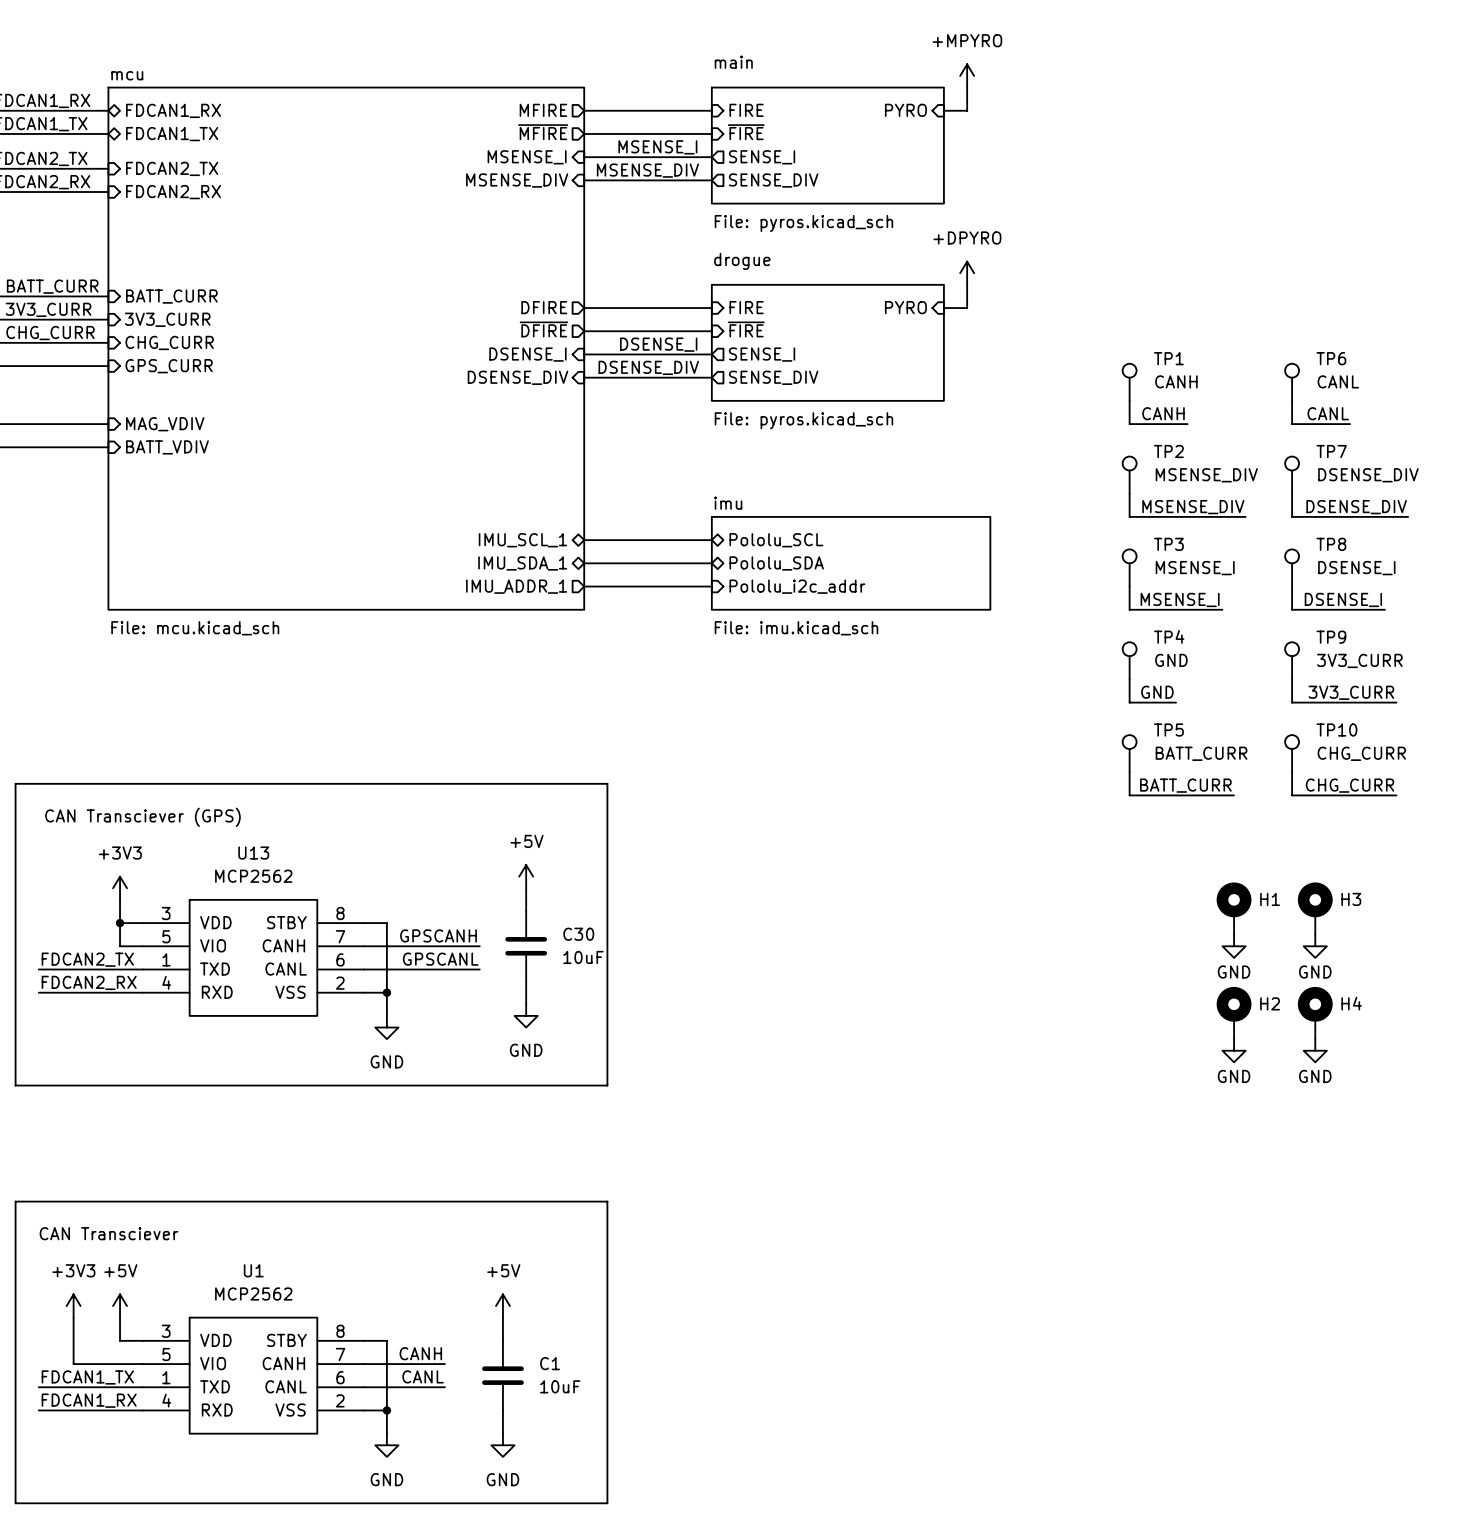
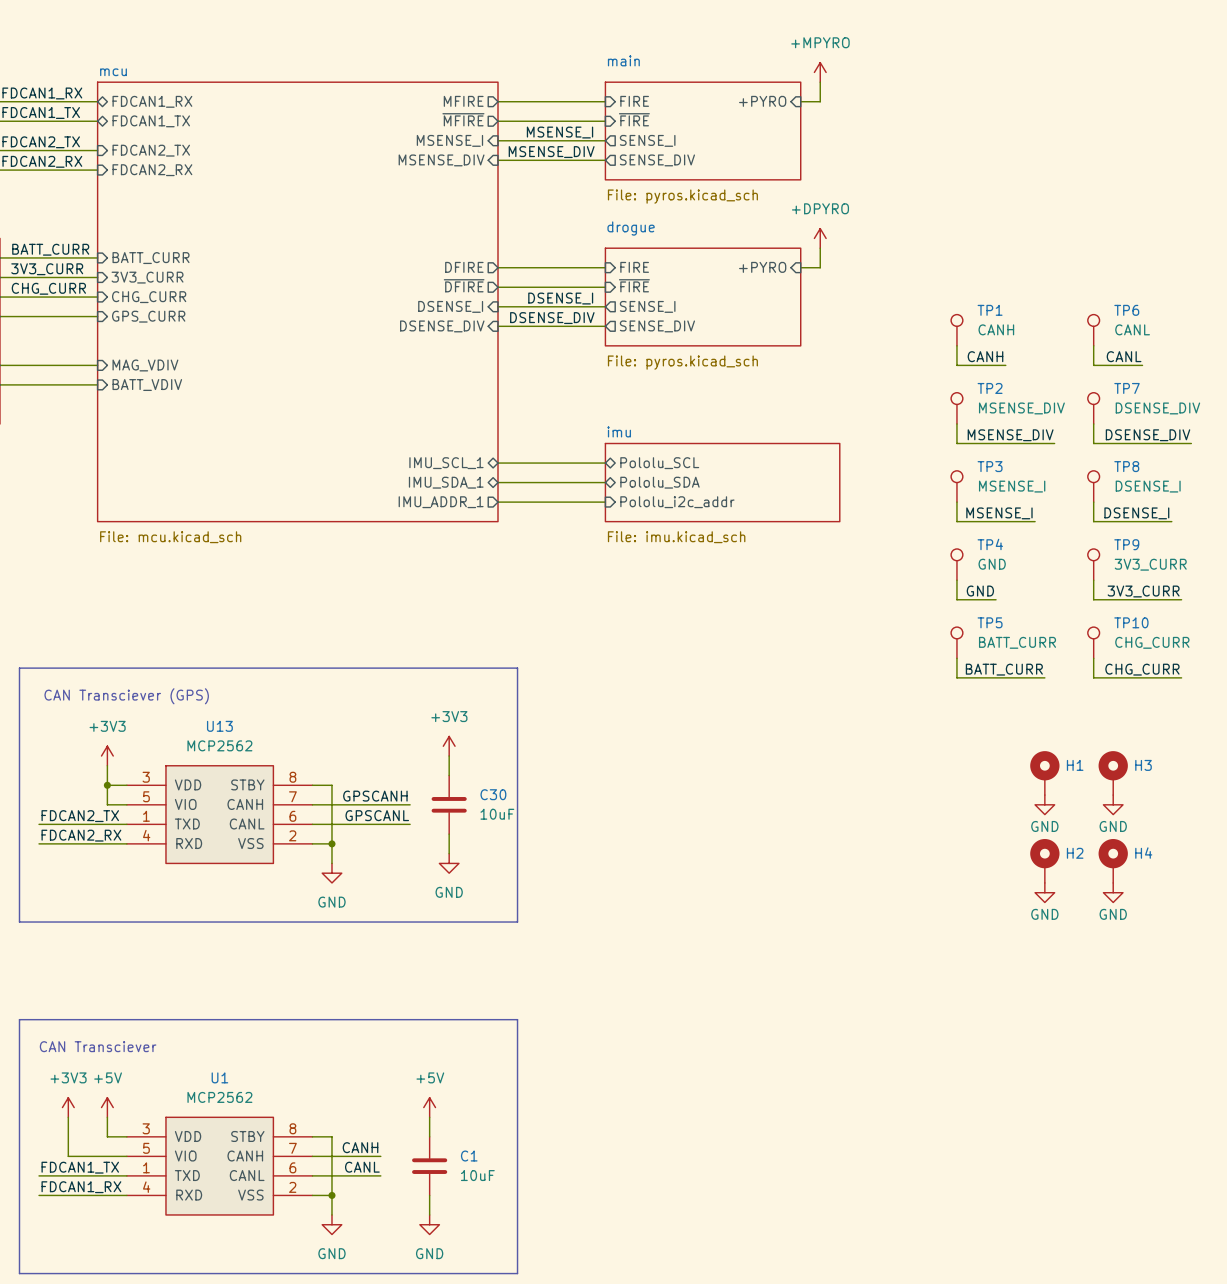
sheet pin: PYRO (905, 110) -> +PYRO (762, 101)
sheet pin: PYRO (905, 307) -> +PYRO (762, 267)
power symbol: +5V (526, 876) -> +3V3 (449, 746)

